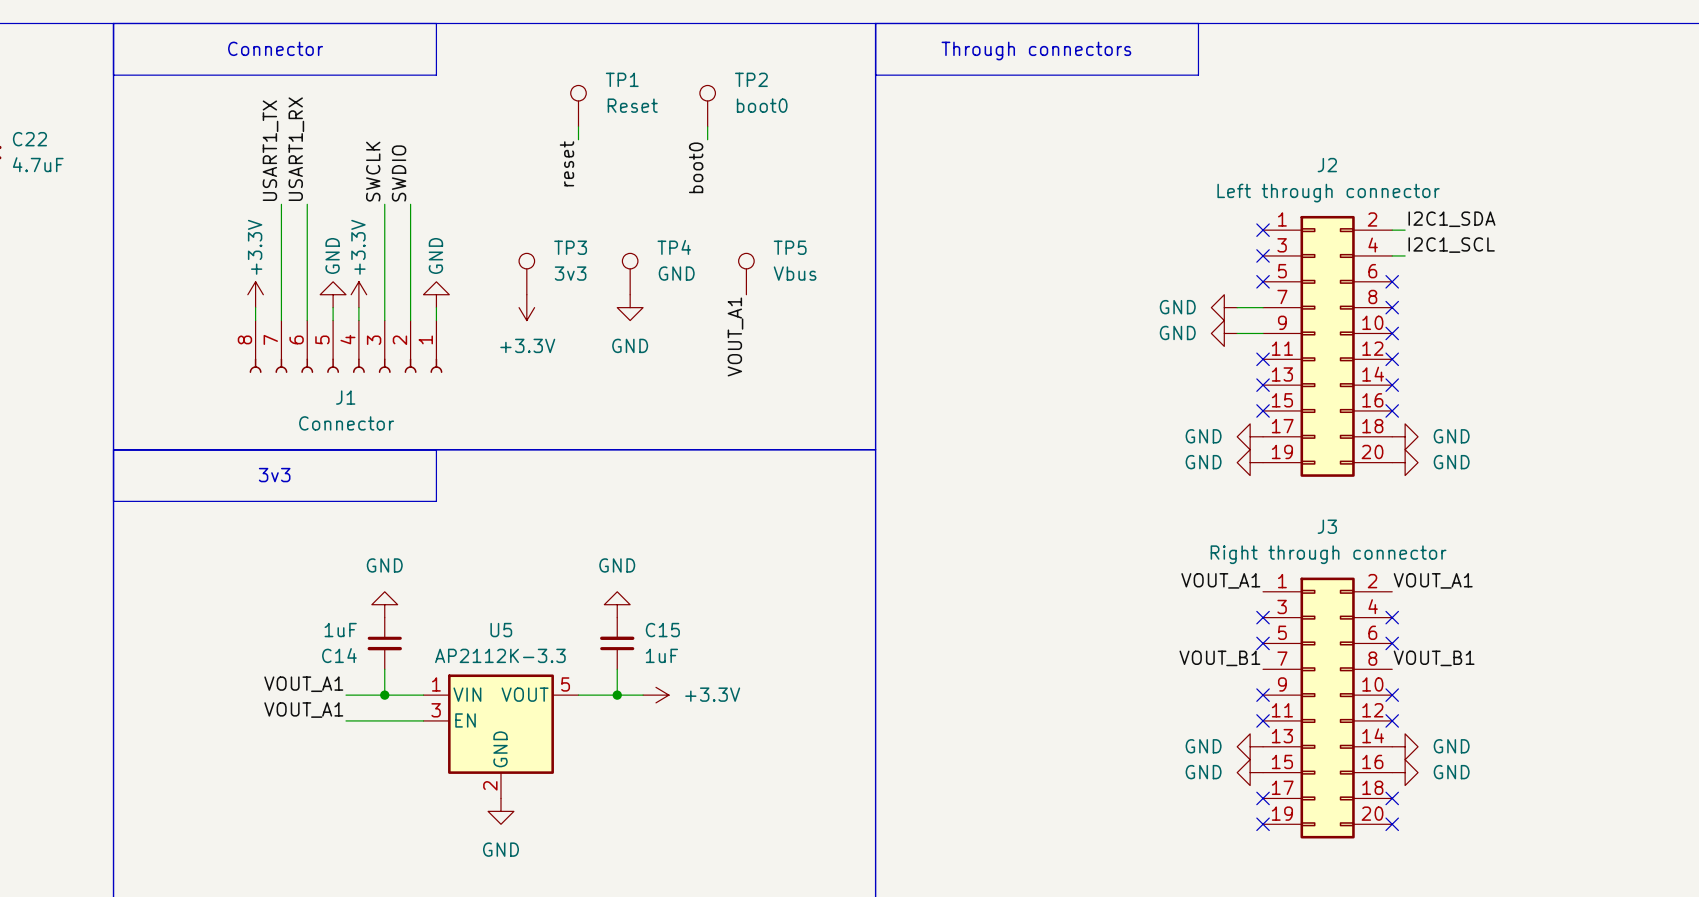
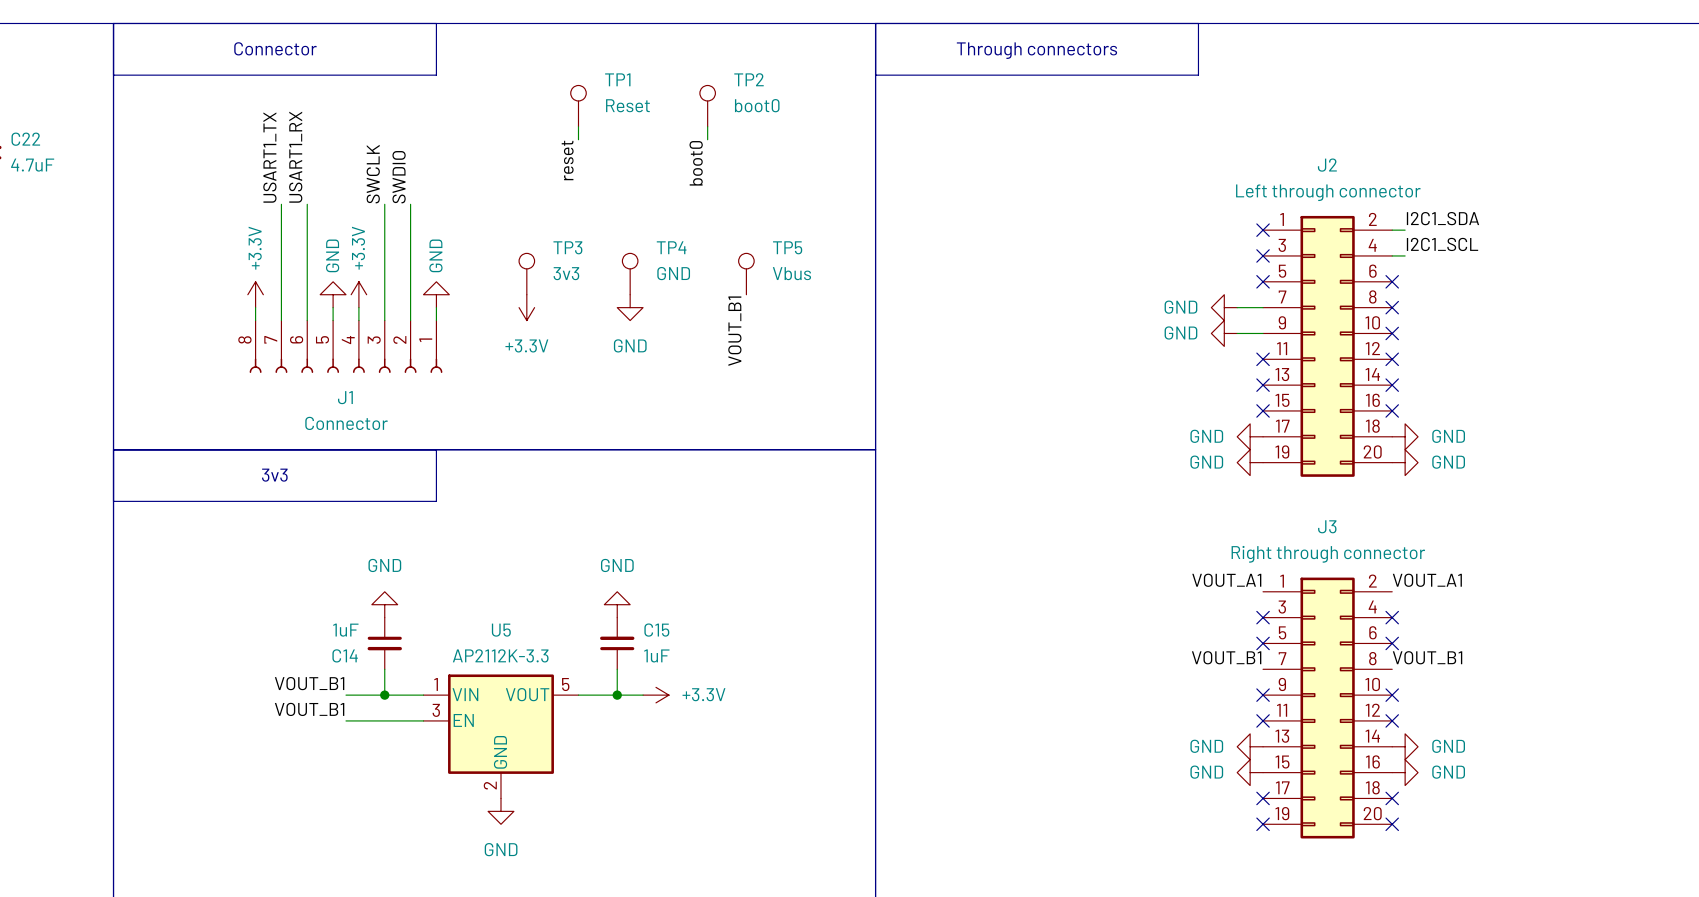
label: VOUT_A1 (735, 336) -> VOUT_B1 (734, 331)
label: VOUT_A1 (303, 684) -> VOUT_B1 (309, 683)
label: VOUT_A1 (303, 710) -> VOUT_B1 (309, 709)

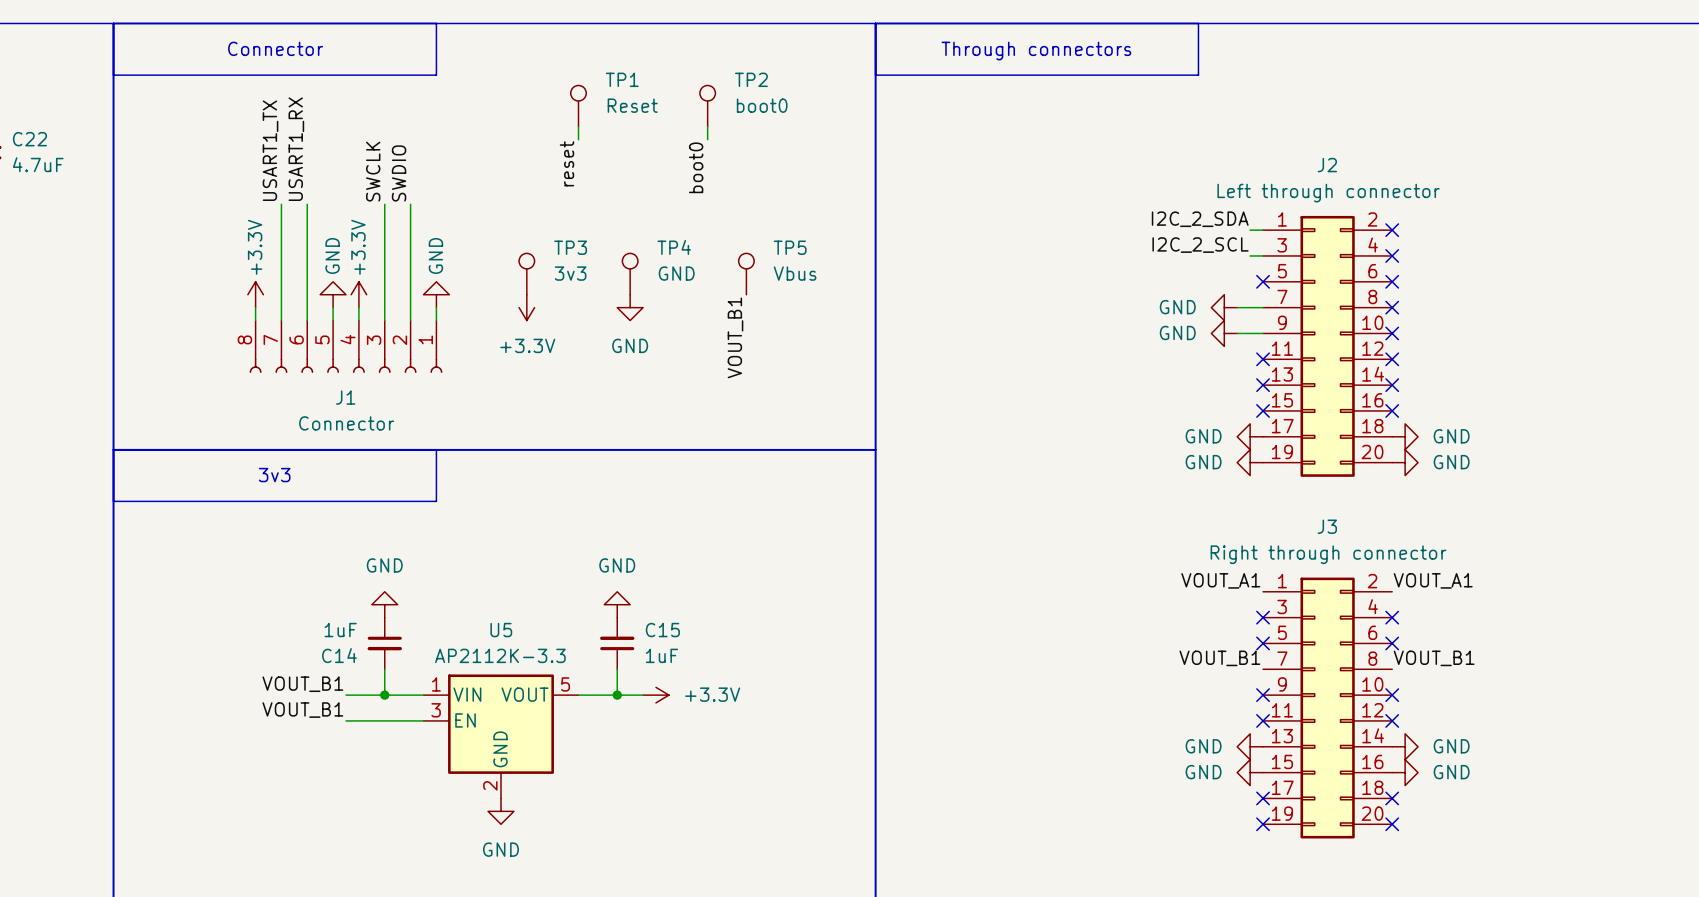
label: none -> I2C_2_SDA (1200, 219)
label: I2C1_SDA (1442, 218) -> none
no-connect mark: (1263, 230) -> none
wire: (1392, 230) (1405, 230) -> (1250, 230) (1263, 230)
no-connect mark: none -> (1392, 230)
label: none -> I2C_2_SCL (1200, 245)
label: I2C1_SCL (1442, 244) -> none
no-connect mark: (1263, 255) -> none
wire: (1392, 255) (1405, 255) -> (1250, 255) (1263, 255)
no-connect mark: none -> (1392, 255)

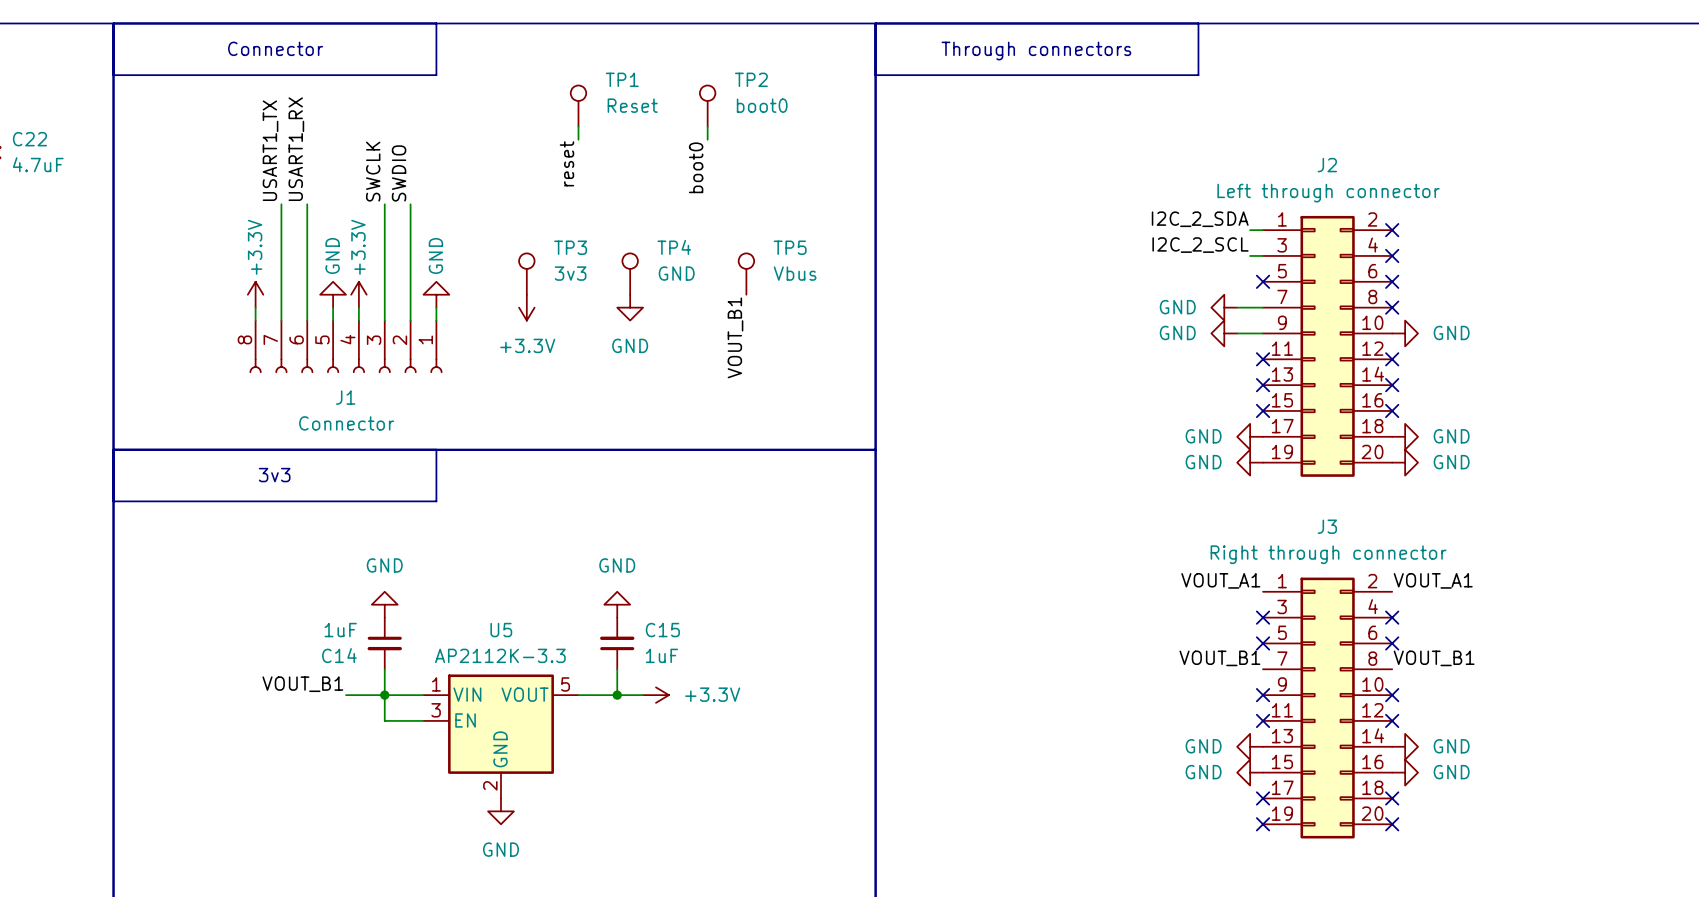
no-connect mark: (1392, 333) -> none
power symbol: none -> GND (1405, 333)
label: VOUT_B1 (302, 710) -> none
wire: (346, 720) (384, 720) -> (384, 695) (384, 720)

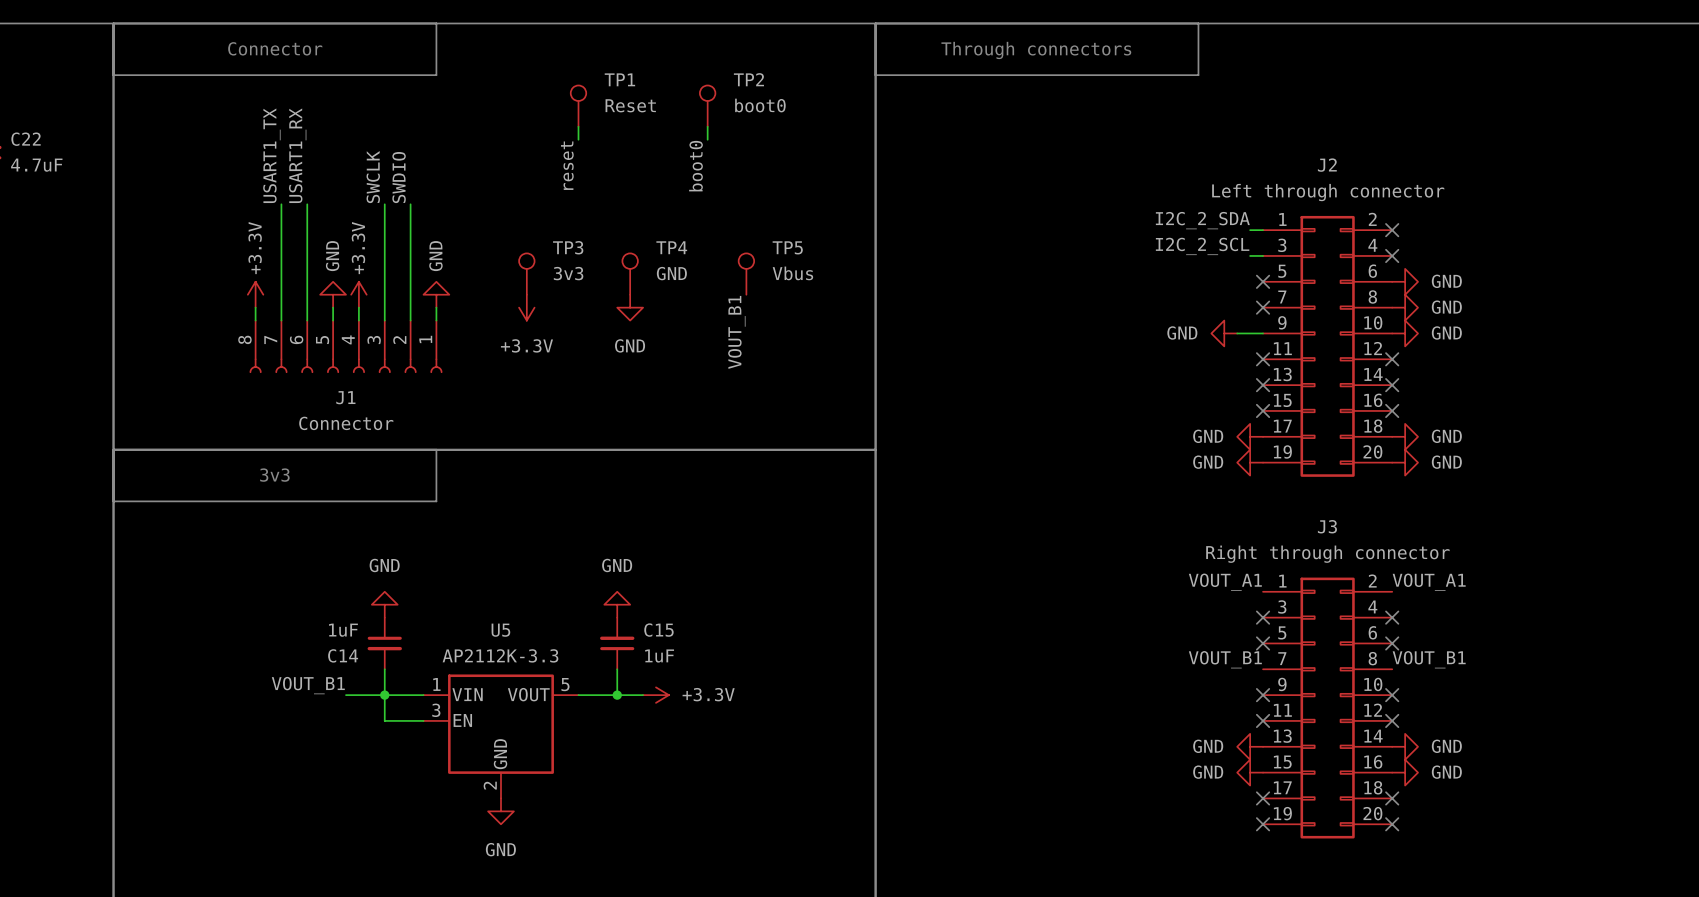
no-connect mark: (1392, 281) -> none
power symbol: none -> GND (1405, 281)
power symbol: GND (1224, 307) -> none
wire: (1237, 307) (1263, 307) -> none
no-connect mark: none -> (1263, 307)
no-connect mark: (1392, 307) -> none
power symbol: none -> GND (1405, 307)

